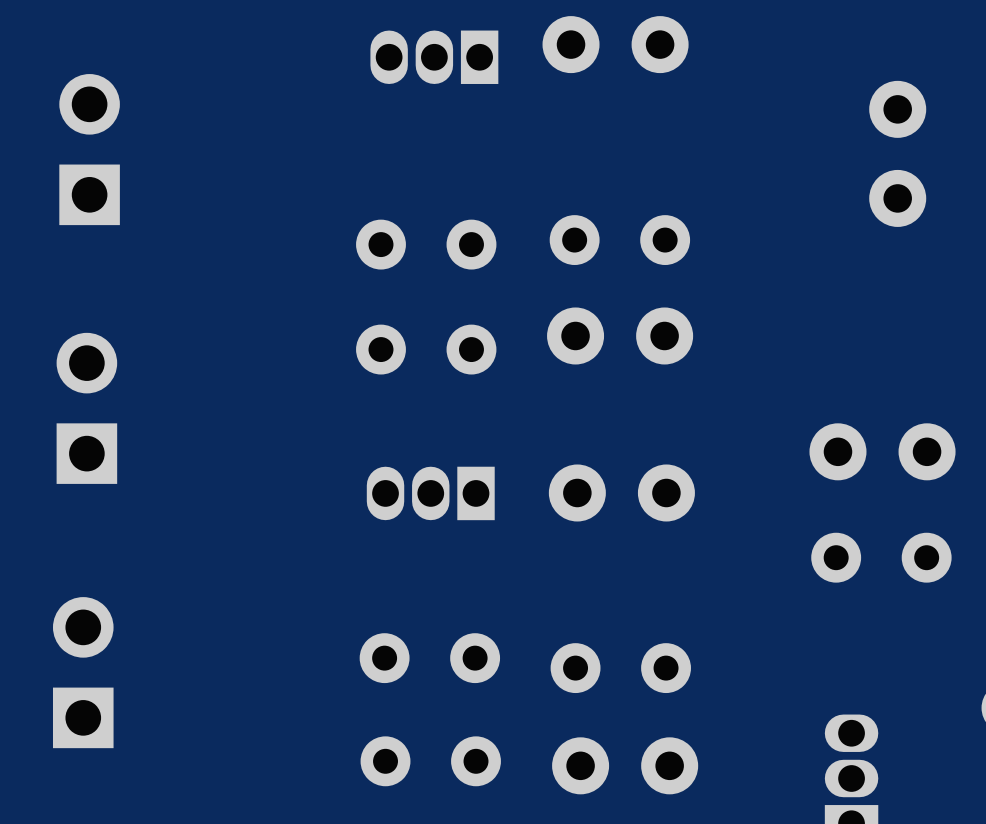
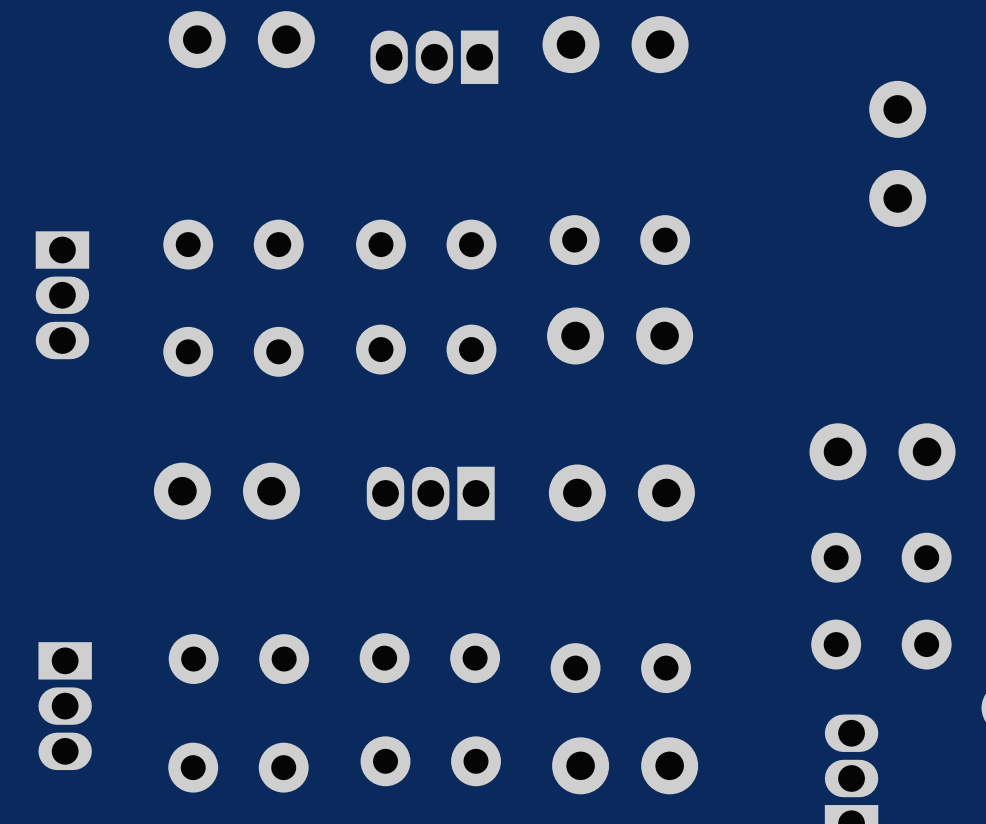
part: none -> (241, 39)
part: (89, 149) -> none
part: none -> (233, 244)
part: none -> (62, 295)
part: none -> (233, 351)
part: (86, 408) -> none
part: none -> (226, 491)
part: none -> (881, 644)
part: none -> (238, 659)
part: (83, 672) -> none
part: none -> (65, 706)
part: none -> (238, 767)

